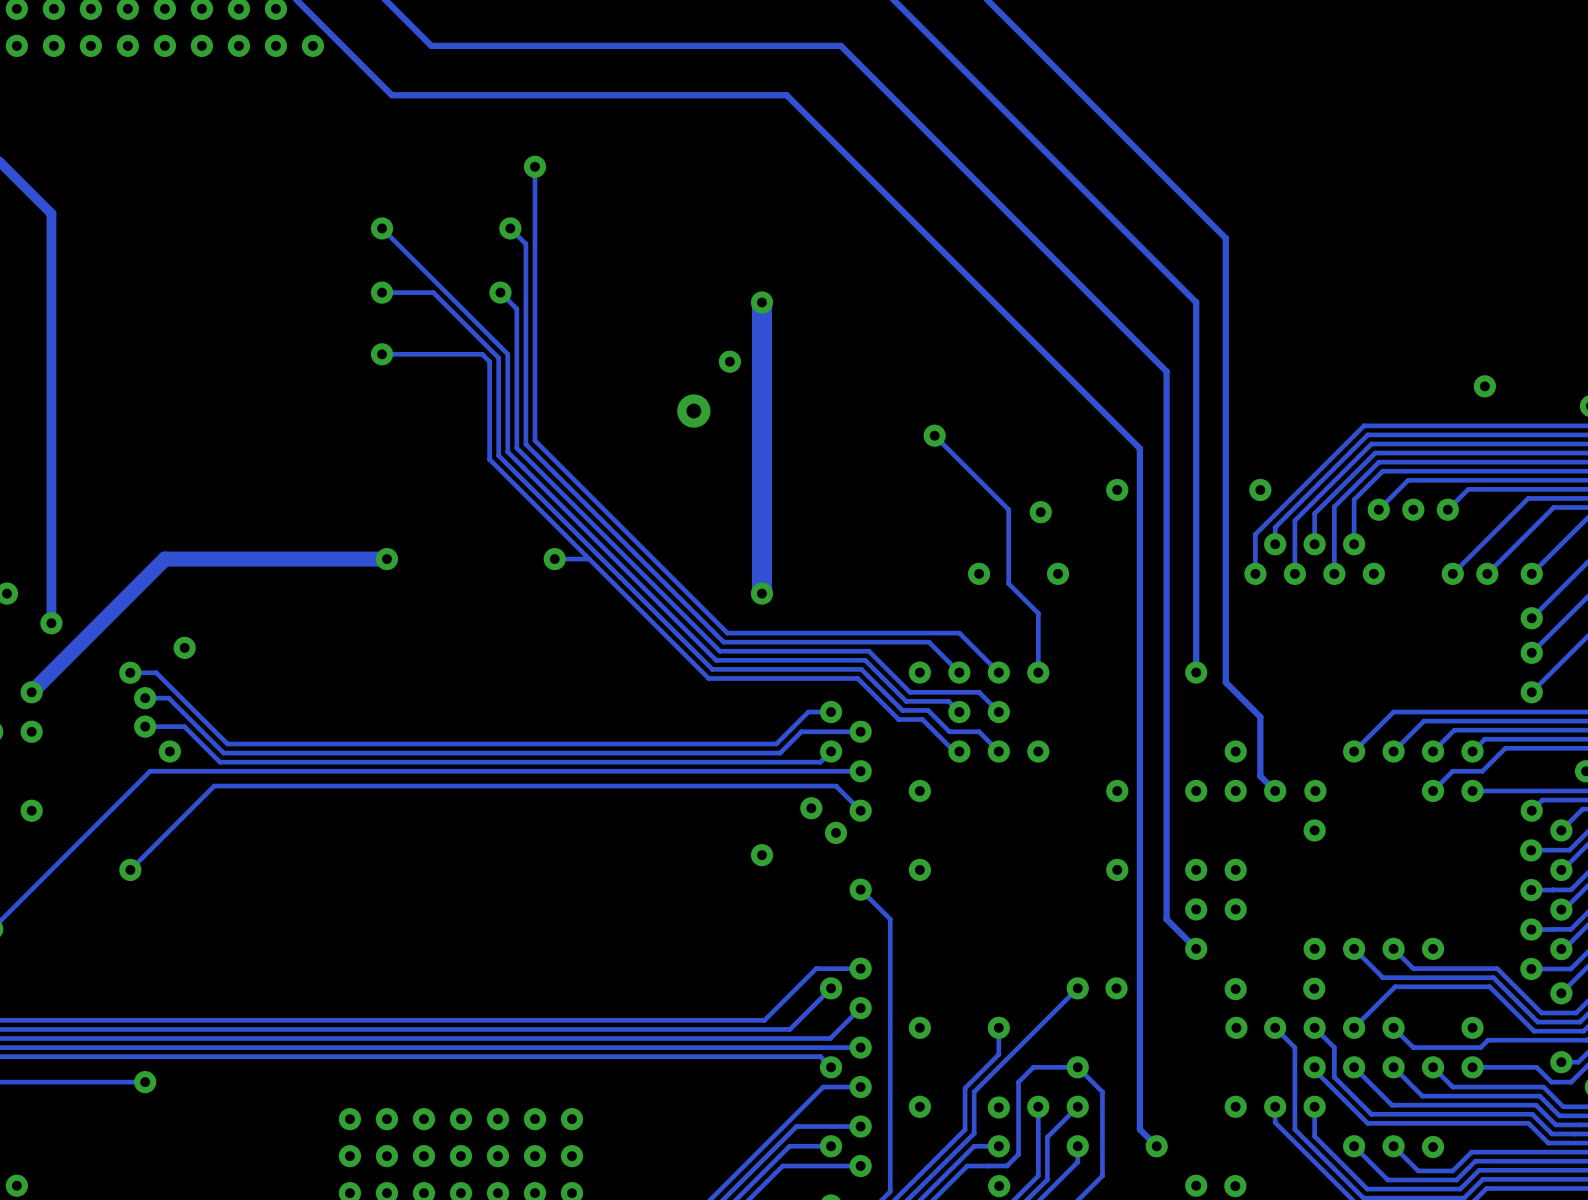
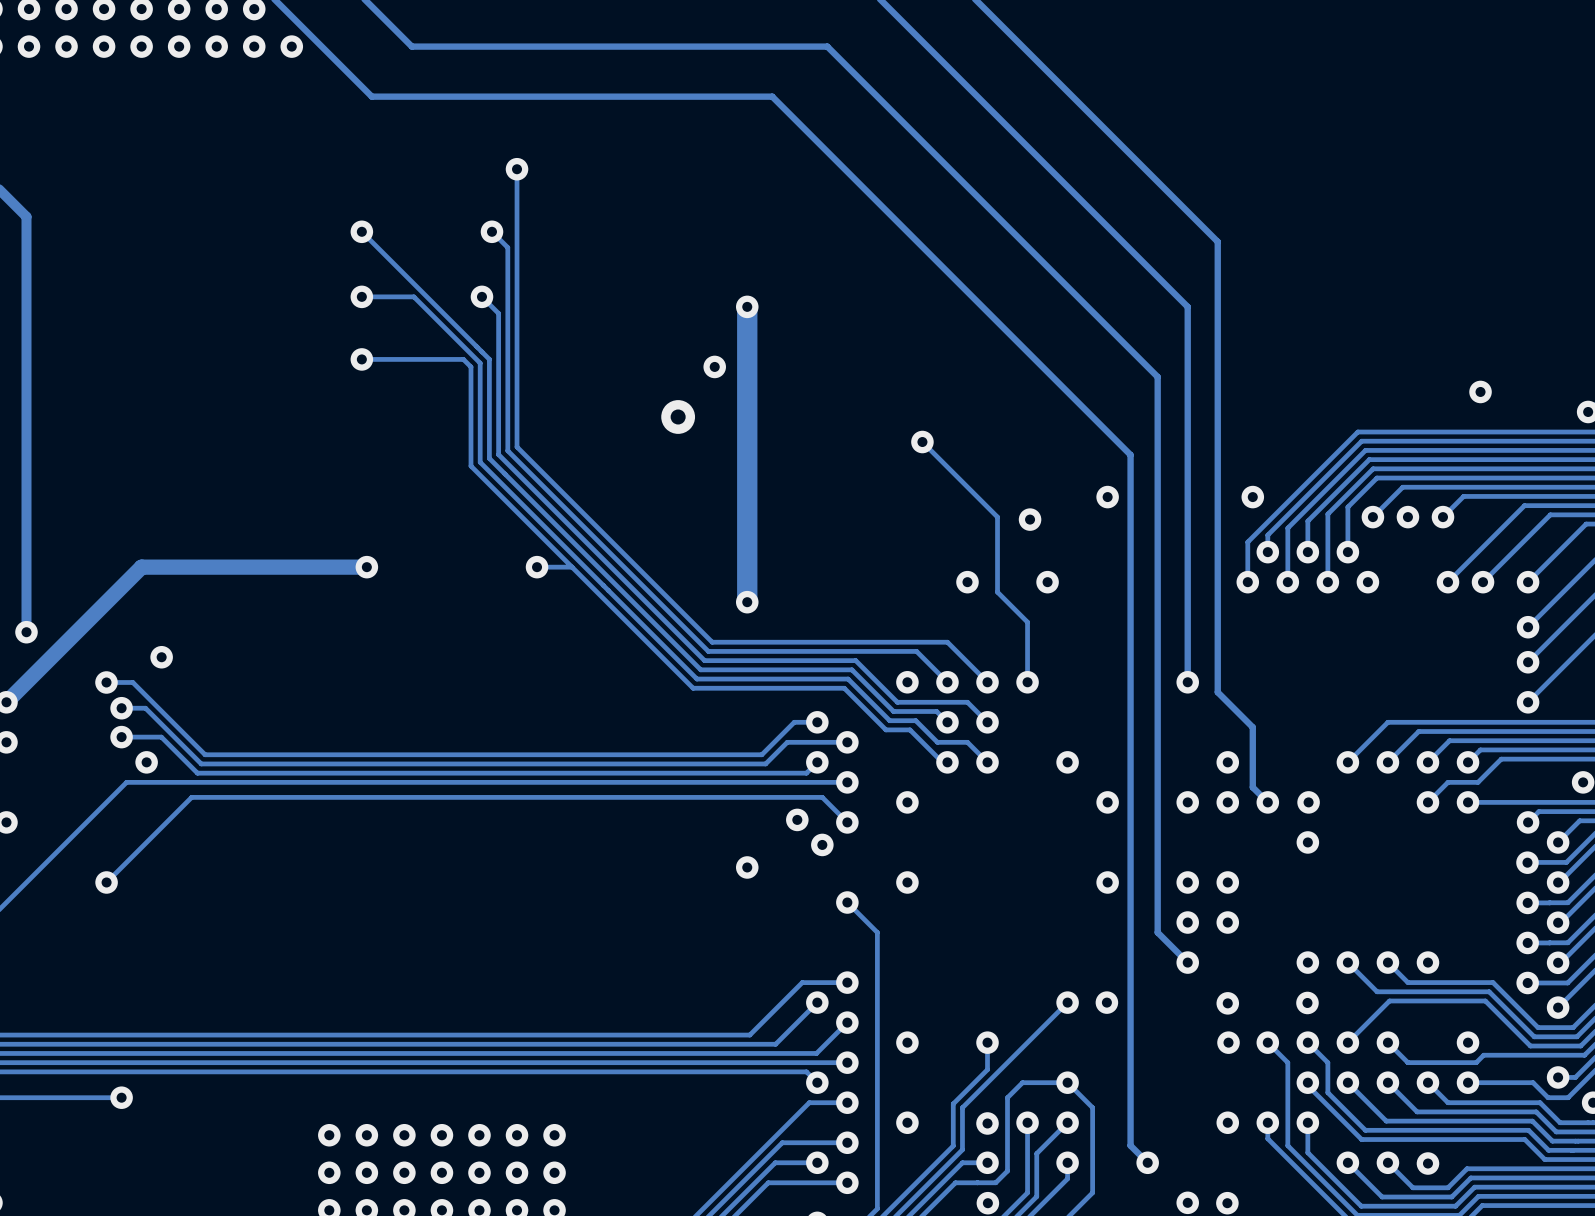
via position: (1038, 751) -> (1067, 762)

